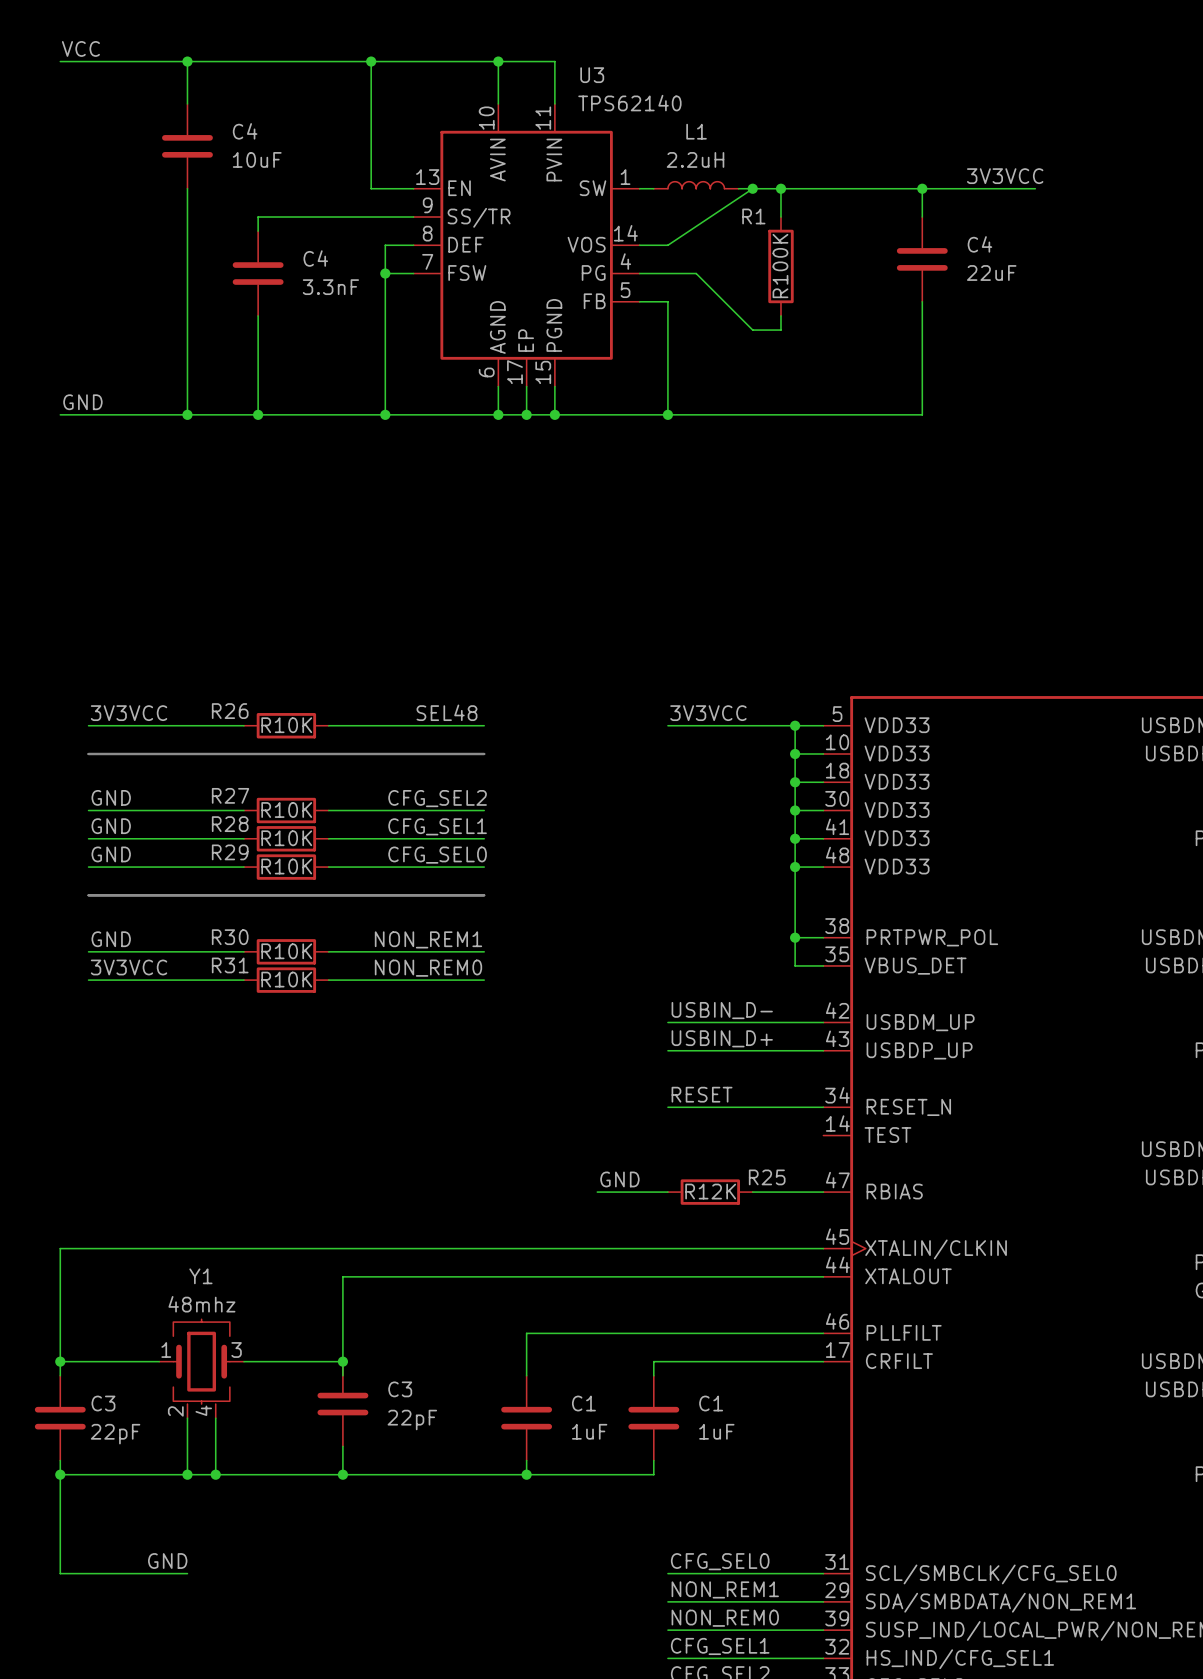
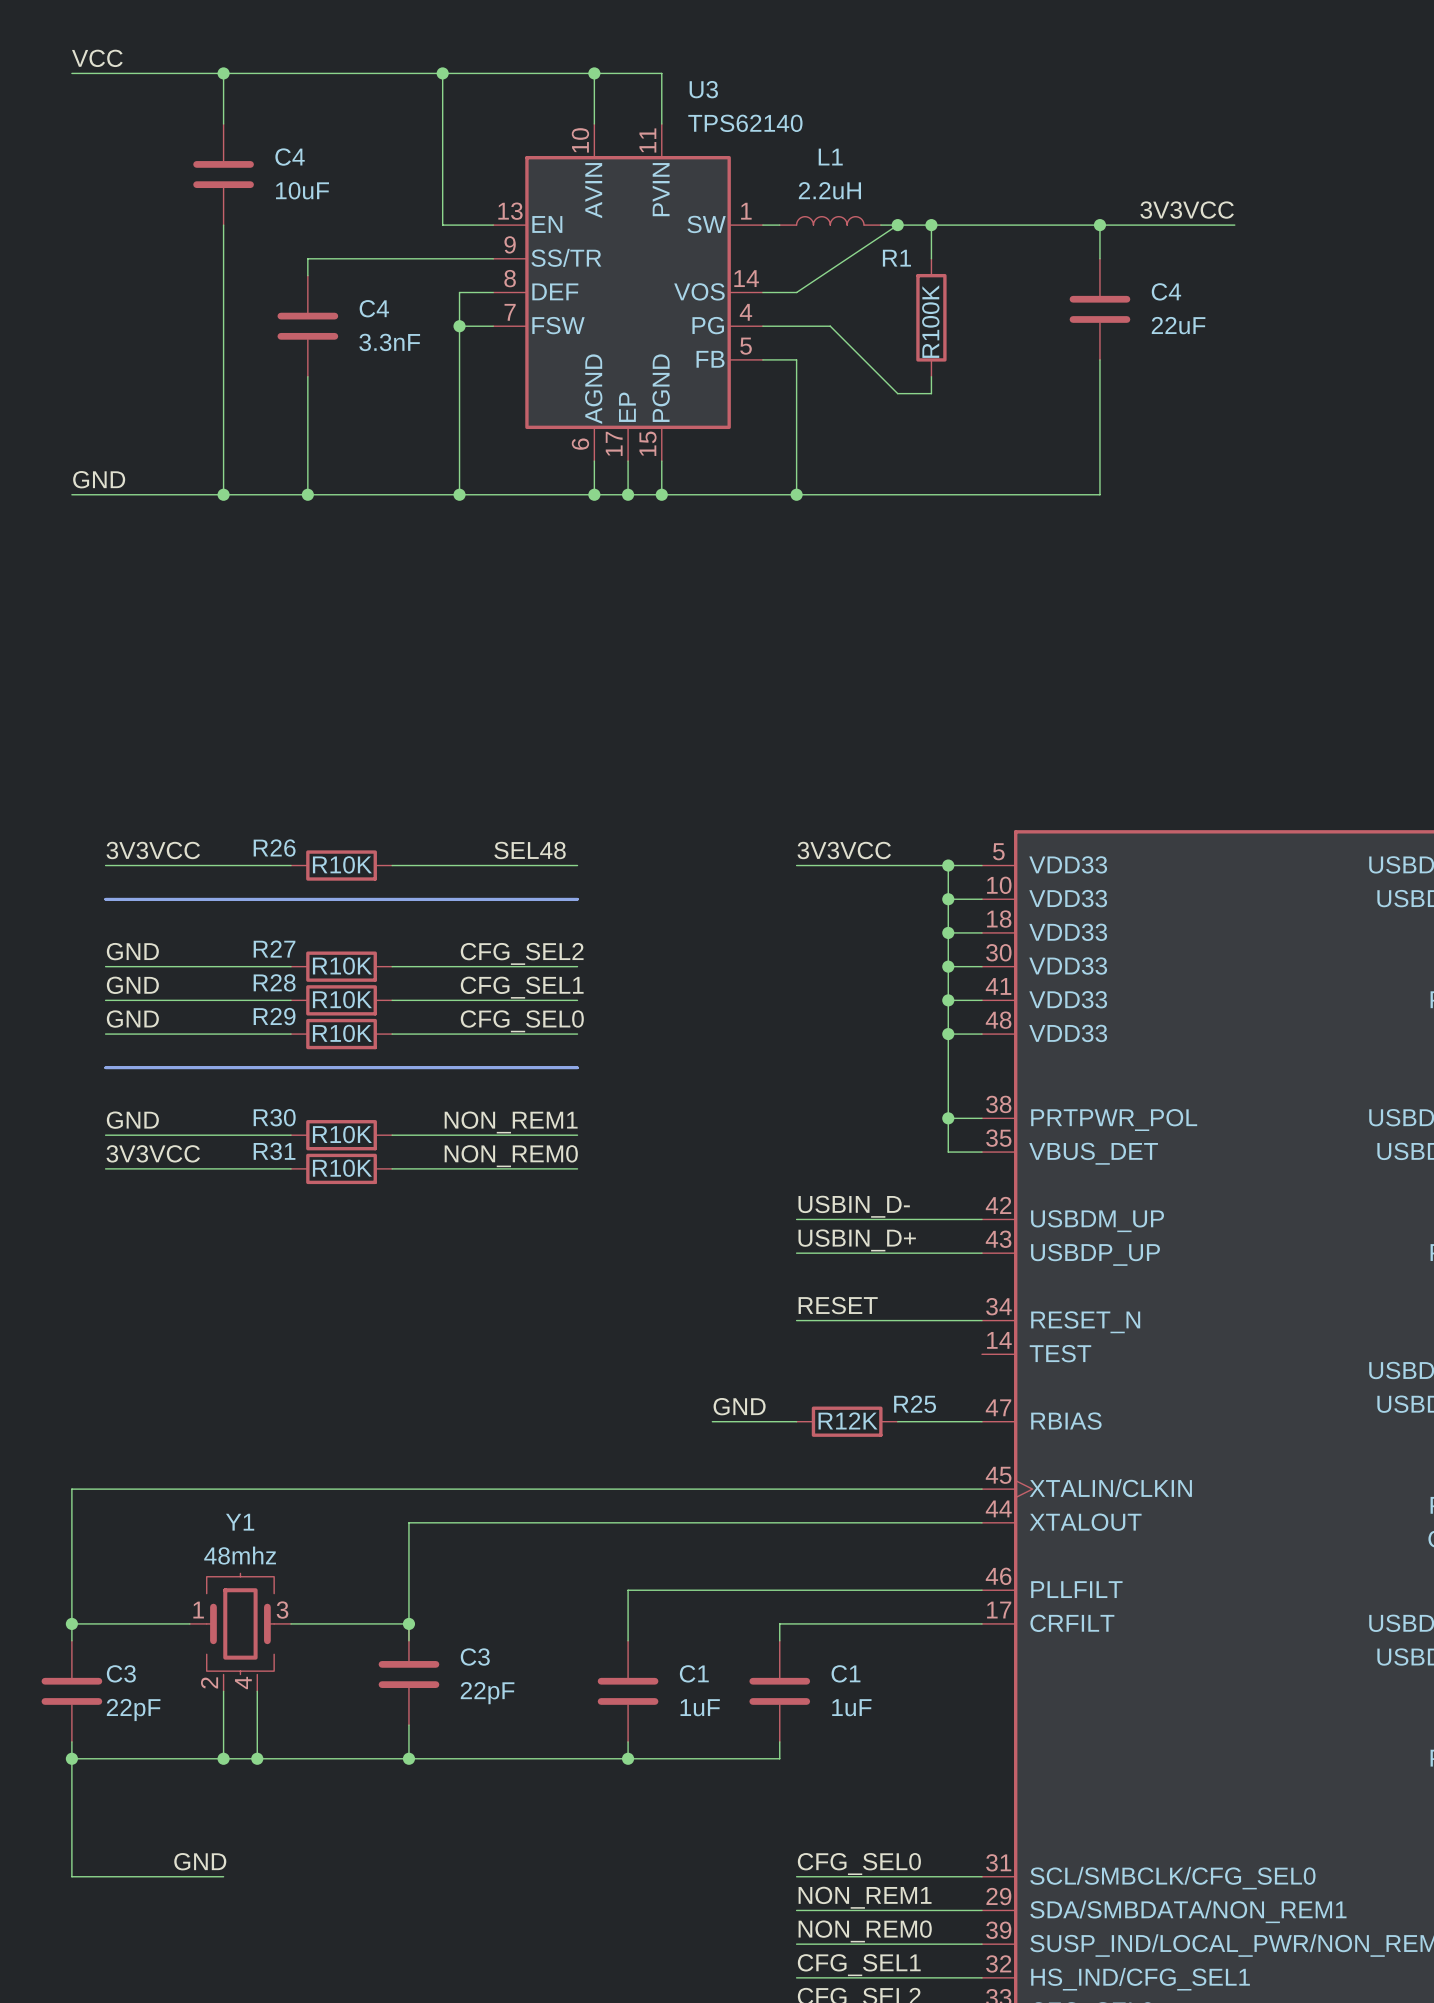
label position: 3V3VCC (1005, 176) -> 3V3VCC (1187, 210)

